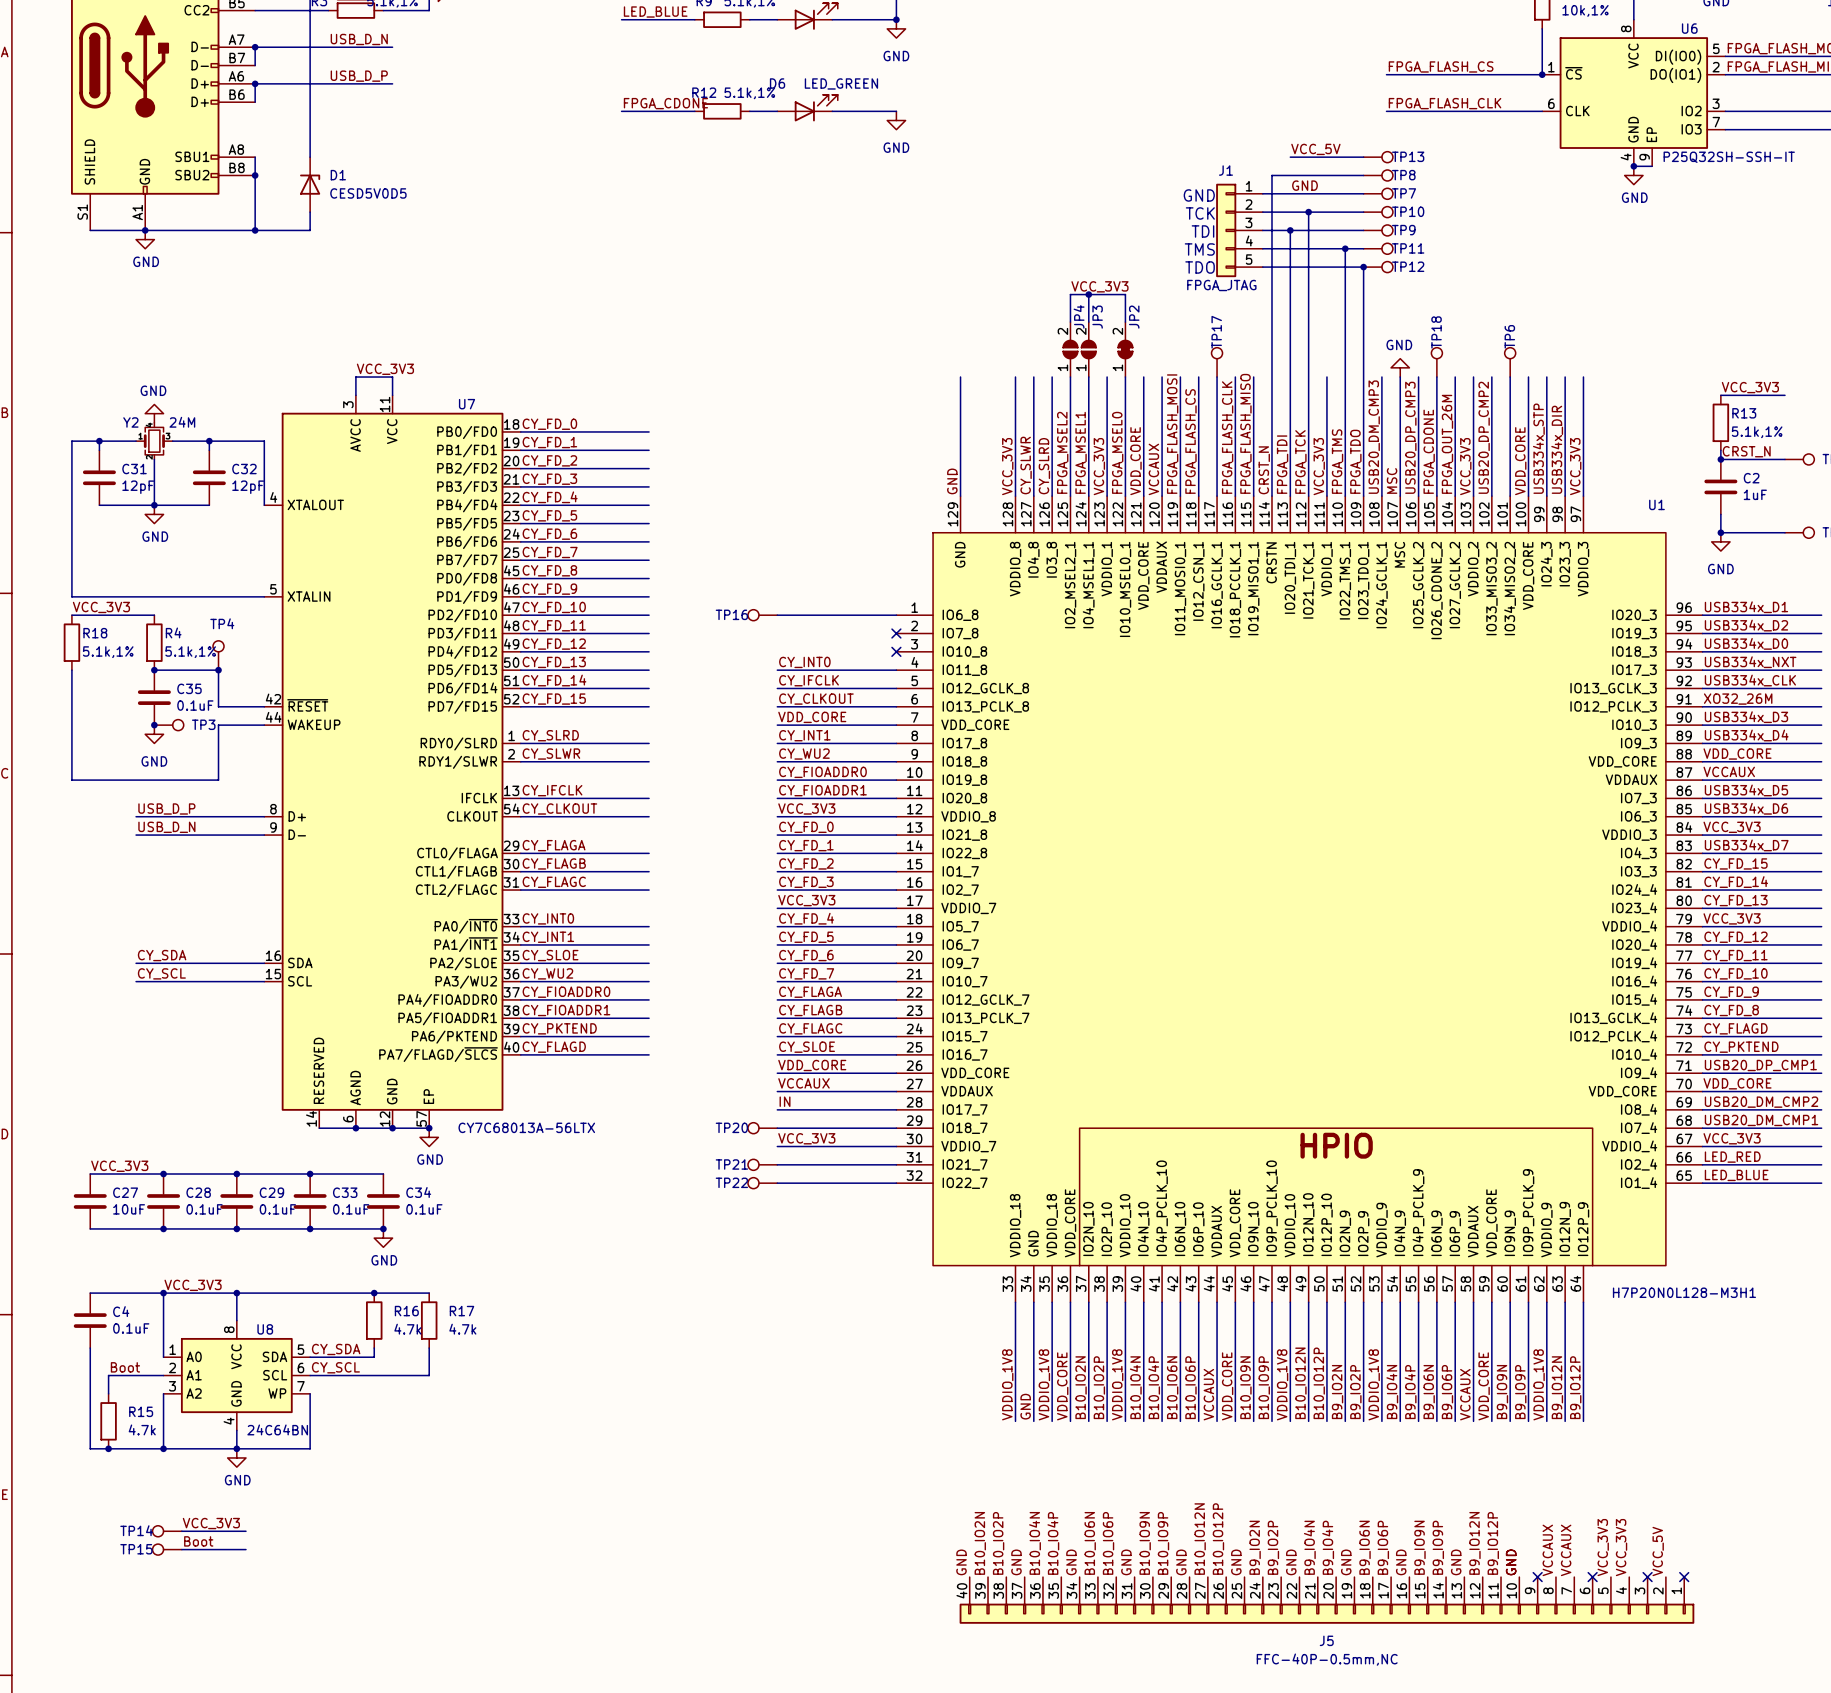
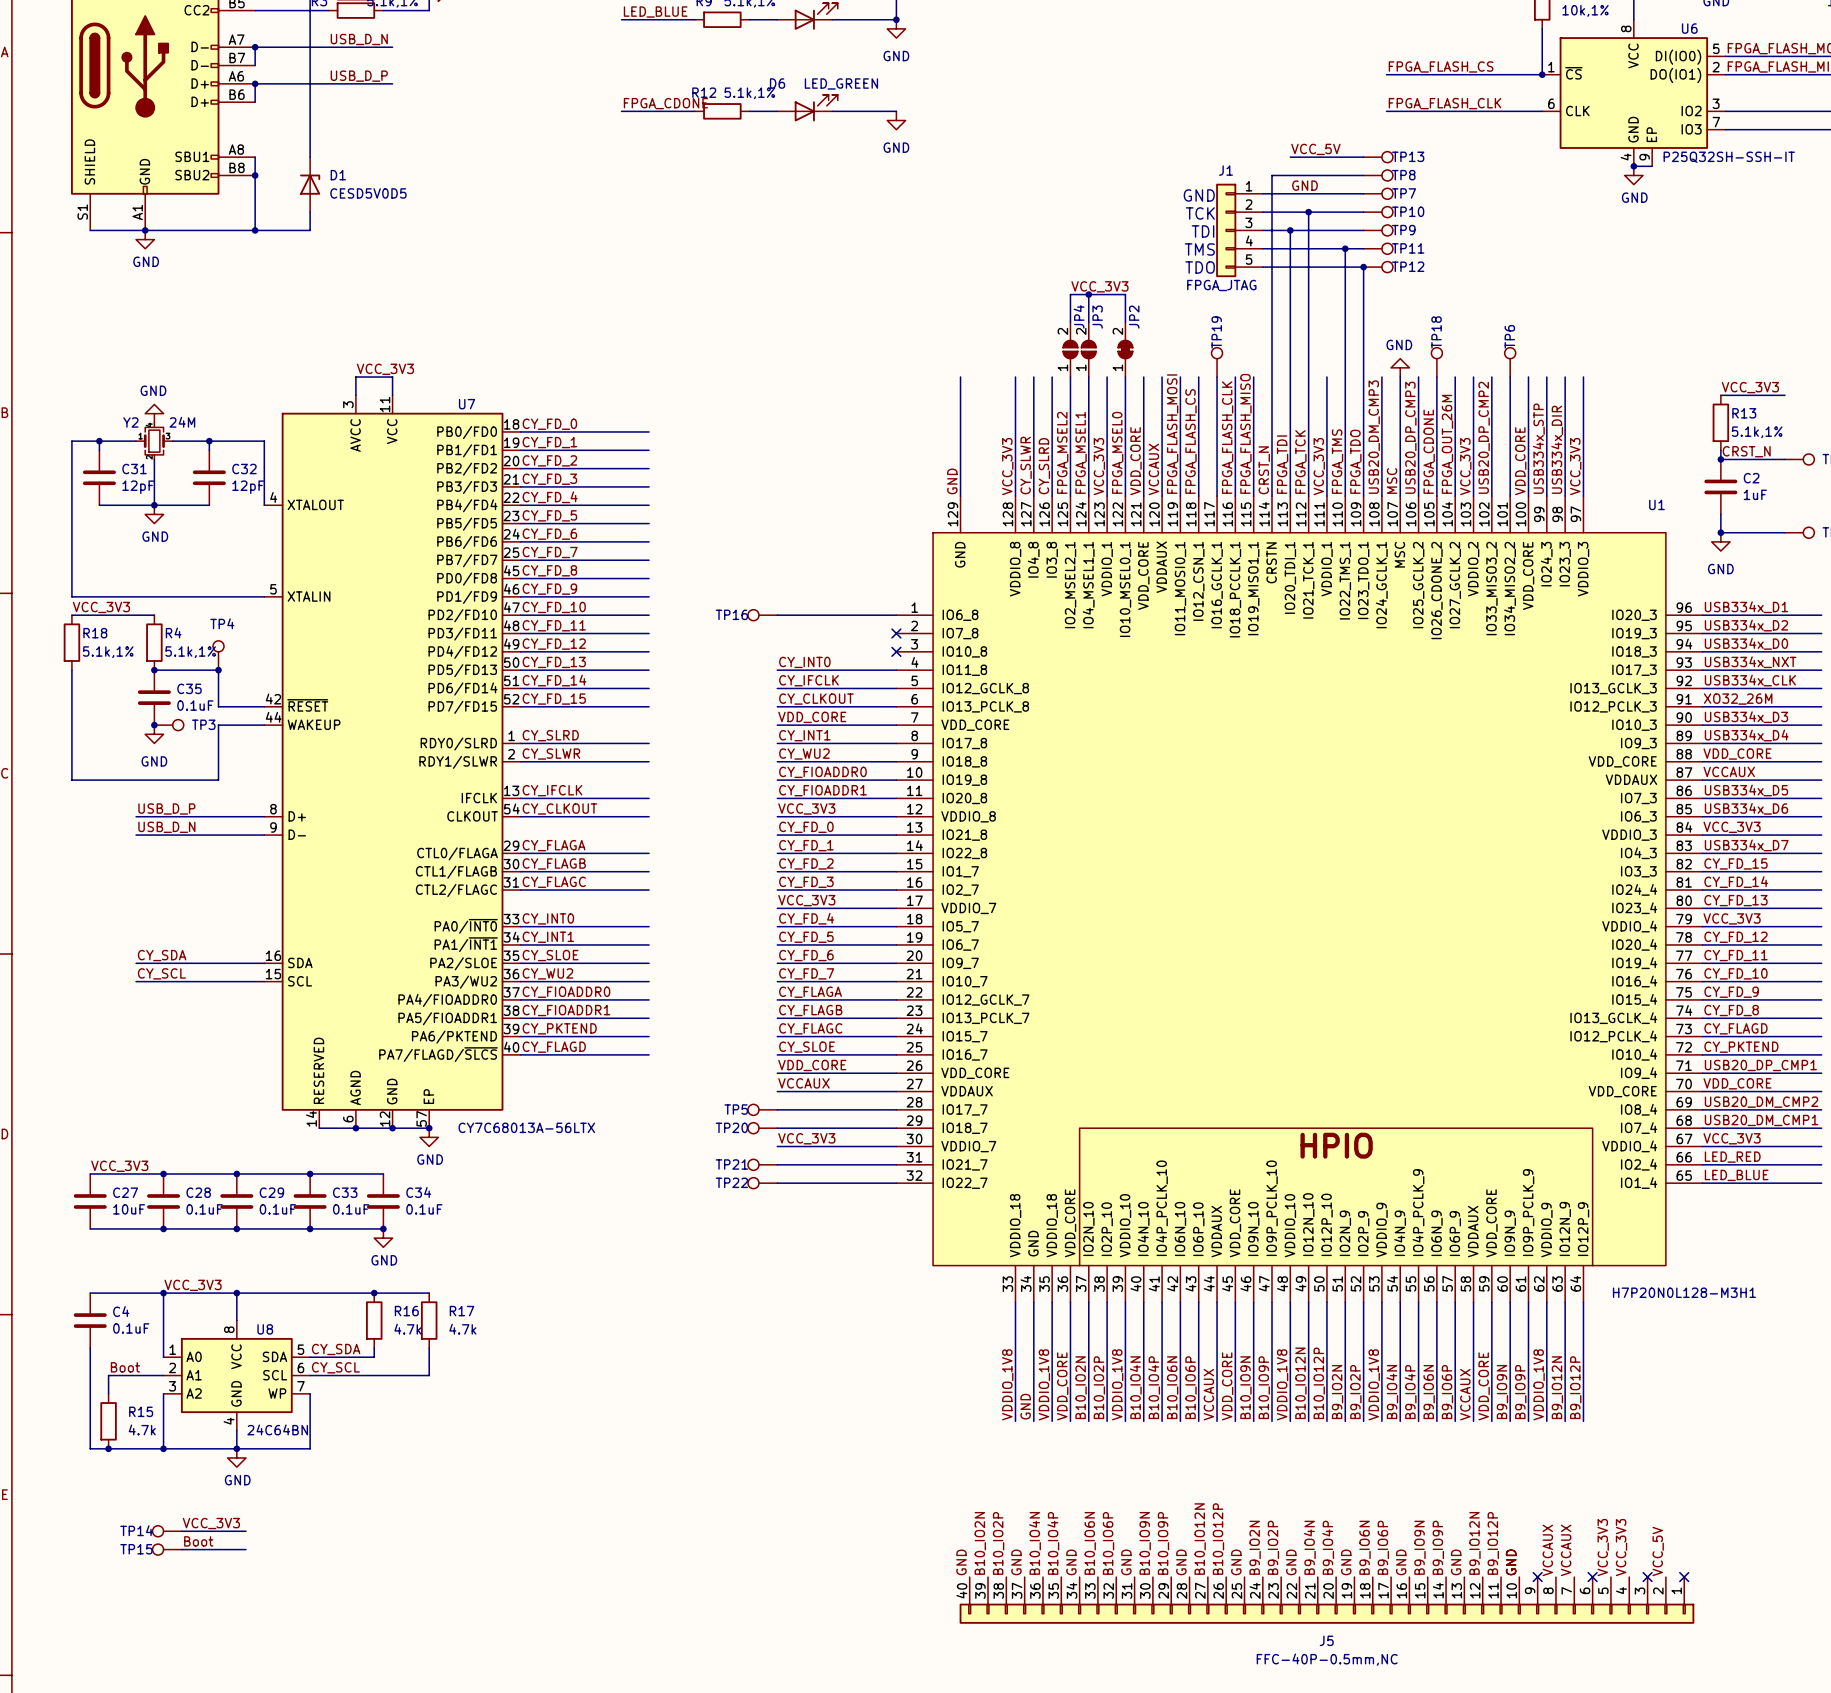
TP17 name: TP17 (1216, 332) -> TP19 (1216, 332)
label: IN (785, 1101) -> none
TP5: none -> (762, 1109)

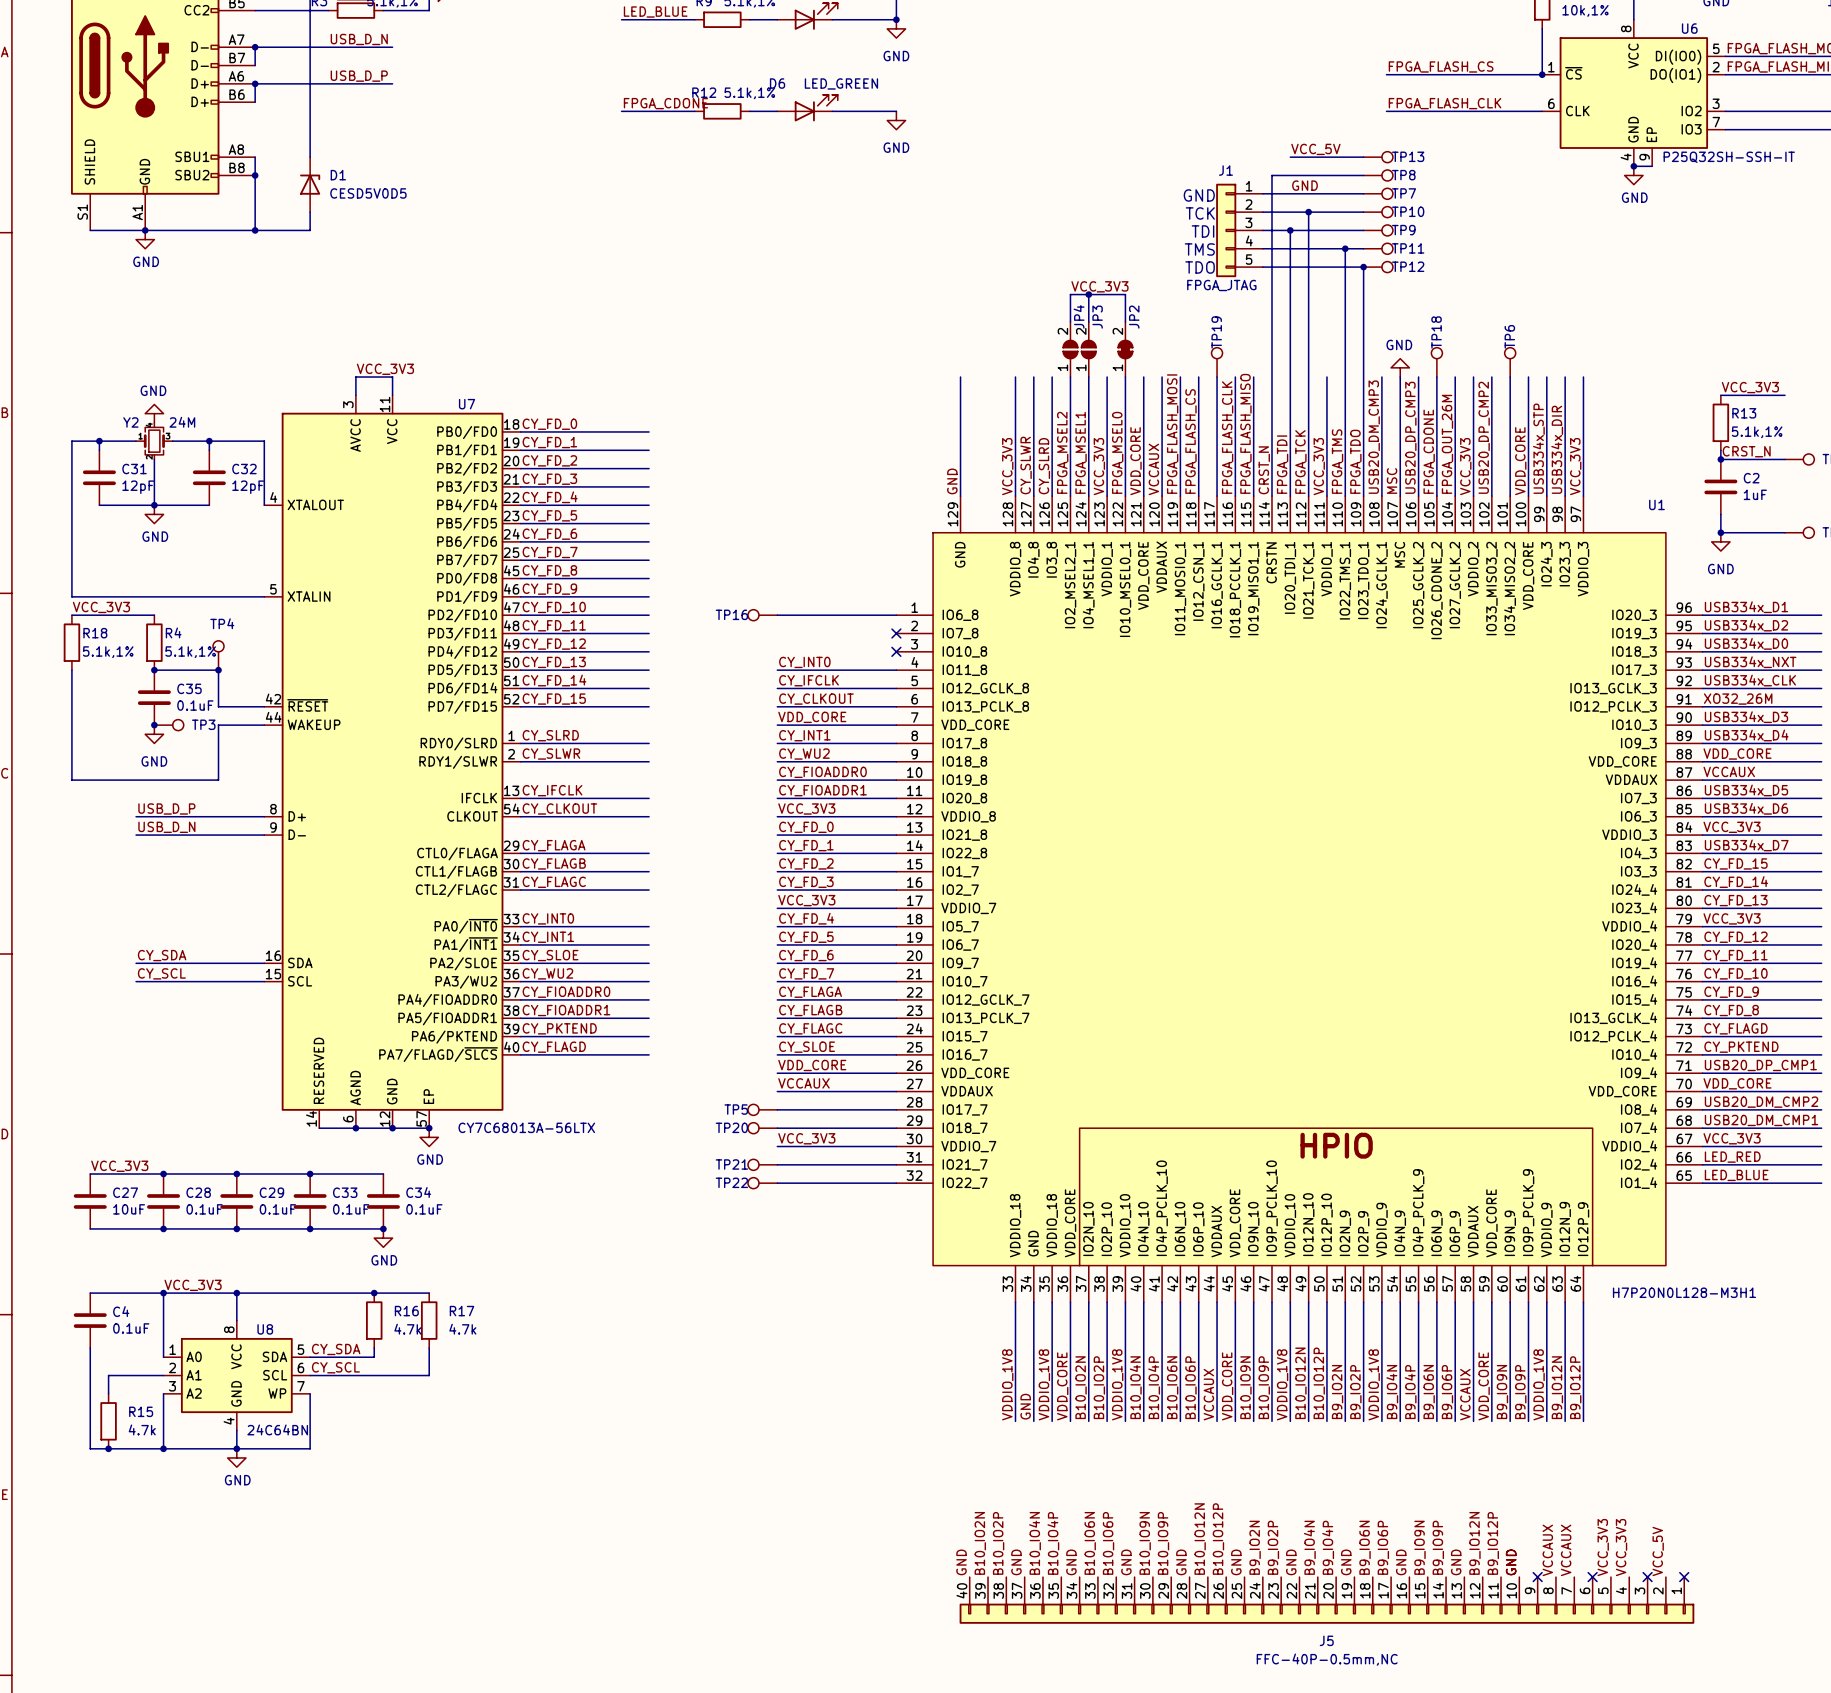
label: Boot (125, 1367) -> none
label: VCC_3V3 (211, 1523) -> none
TP14: (167, 1531) -> none
wire: (181, 1531) (245, 1531) -> none
label: Boot (198, 1541) -> none
TP15: (167, 1549) -> none
wire: (181, 1549) (245, 1549) -> none

